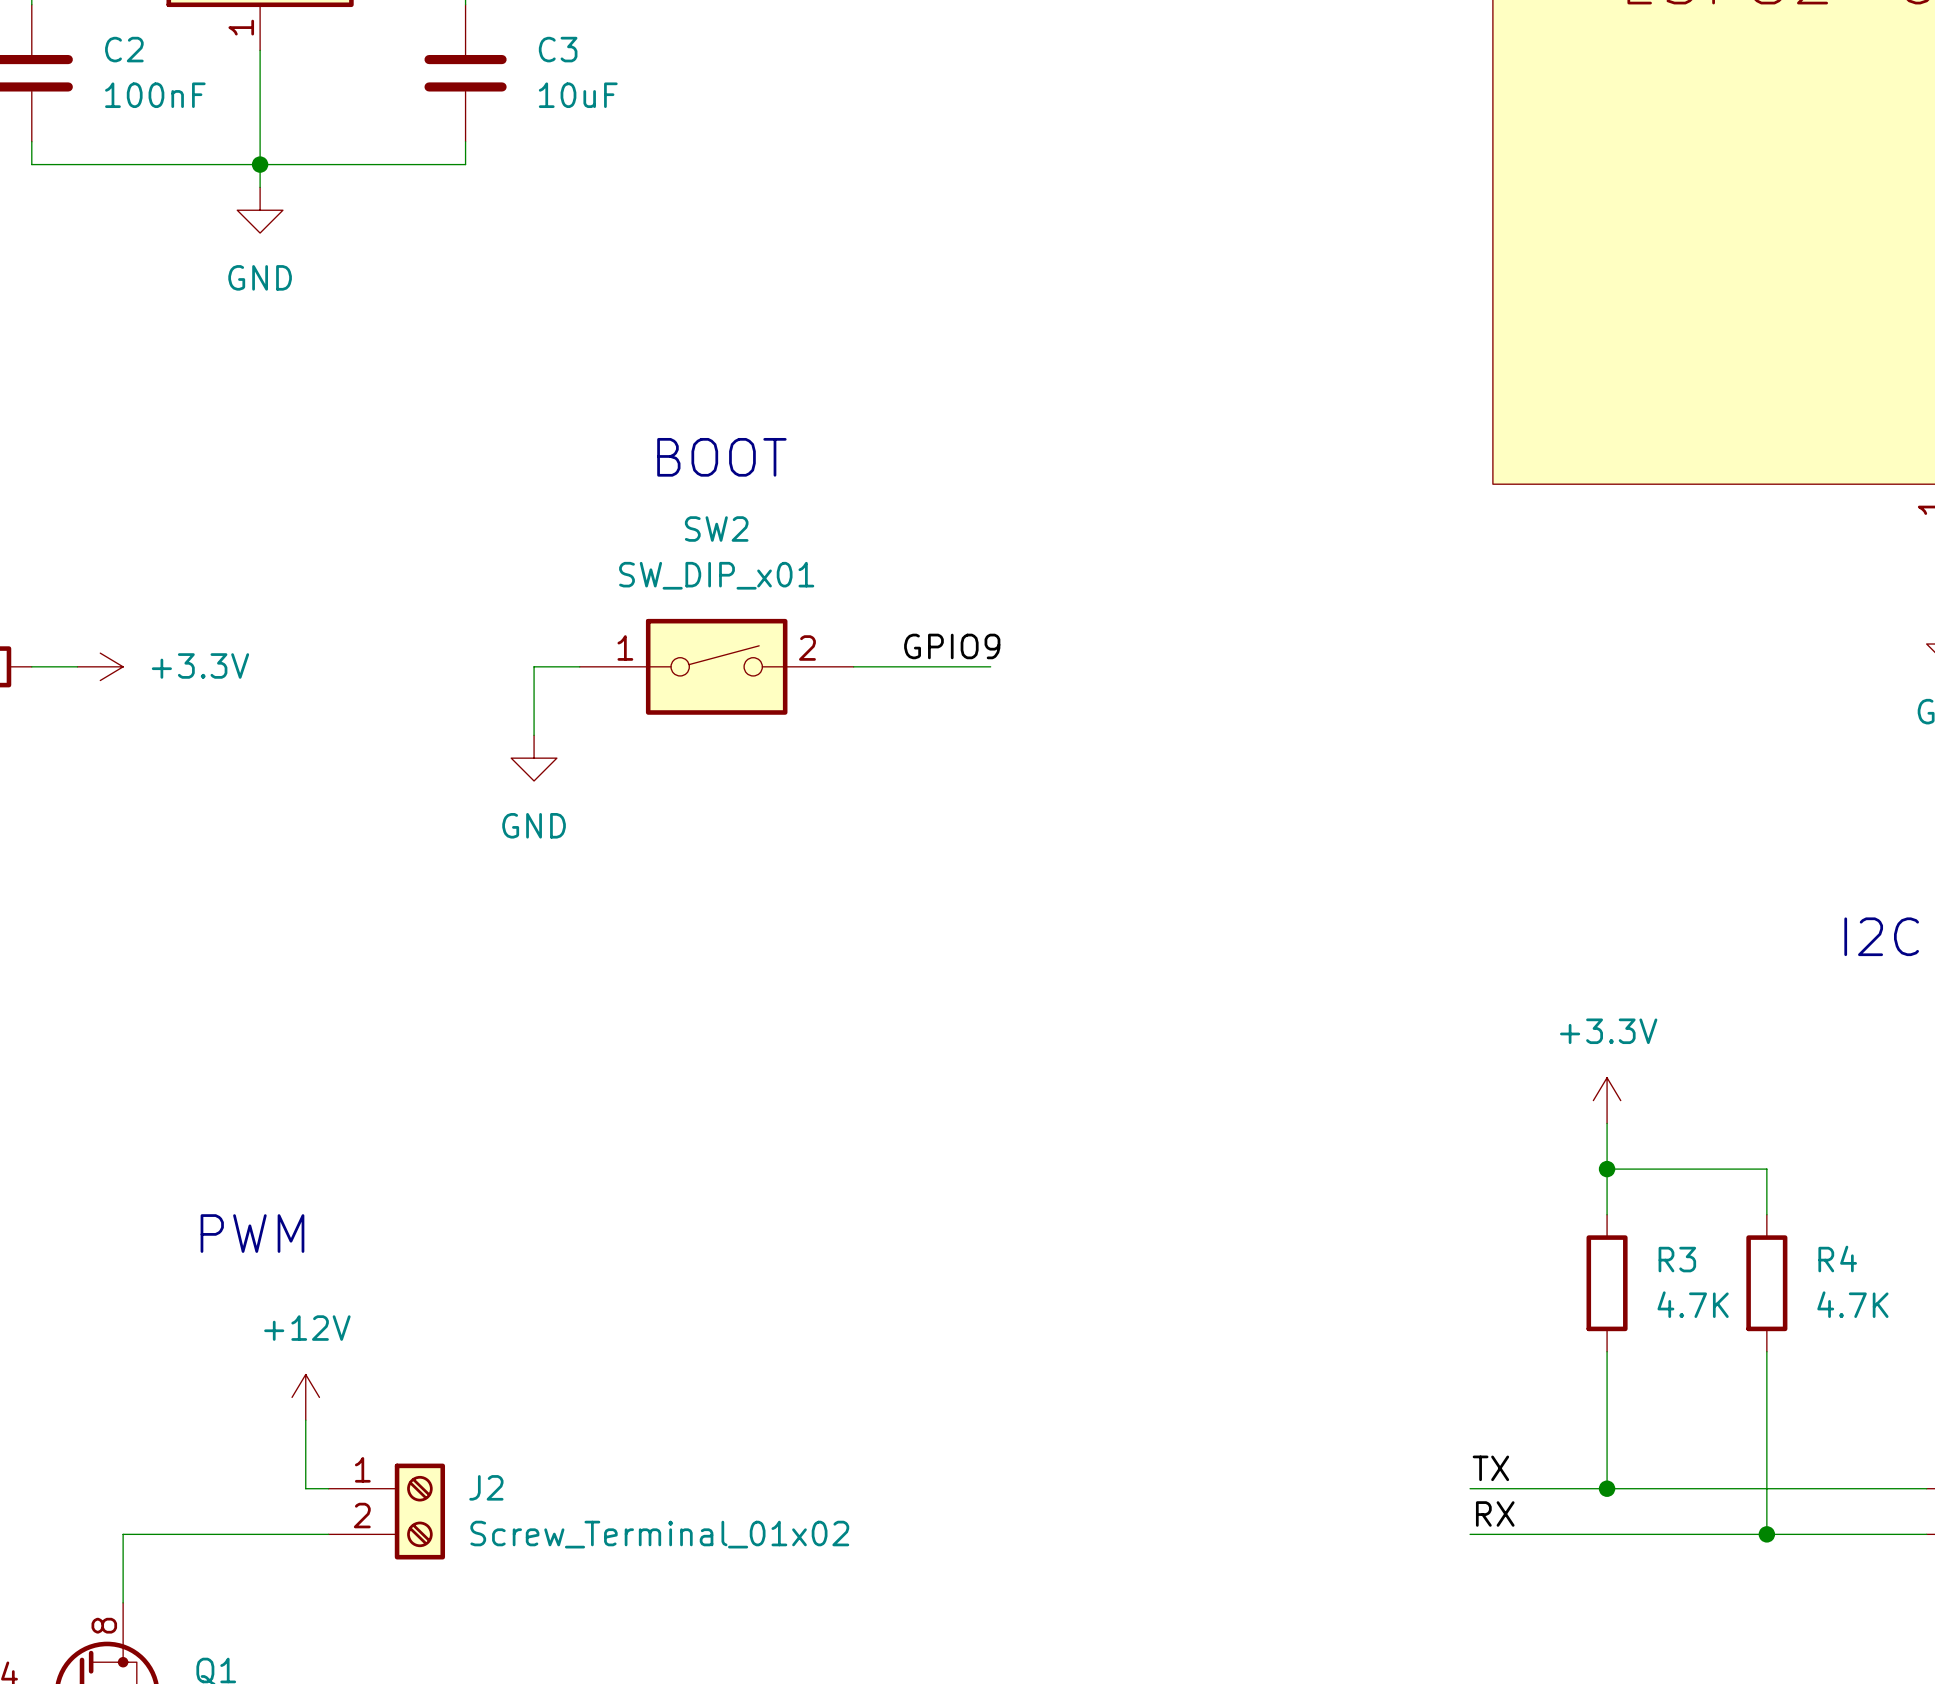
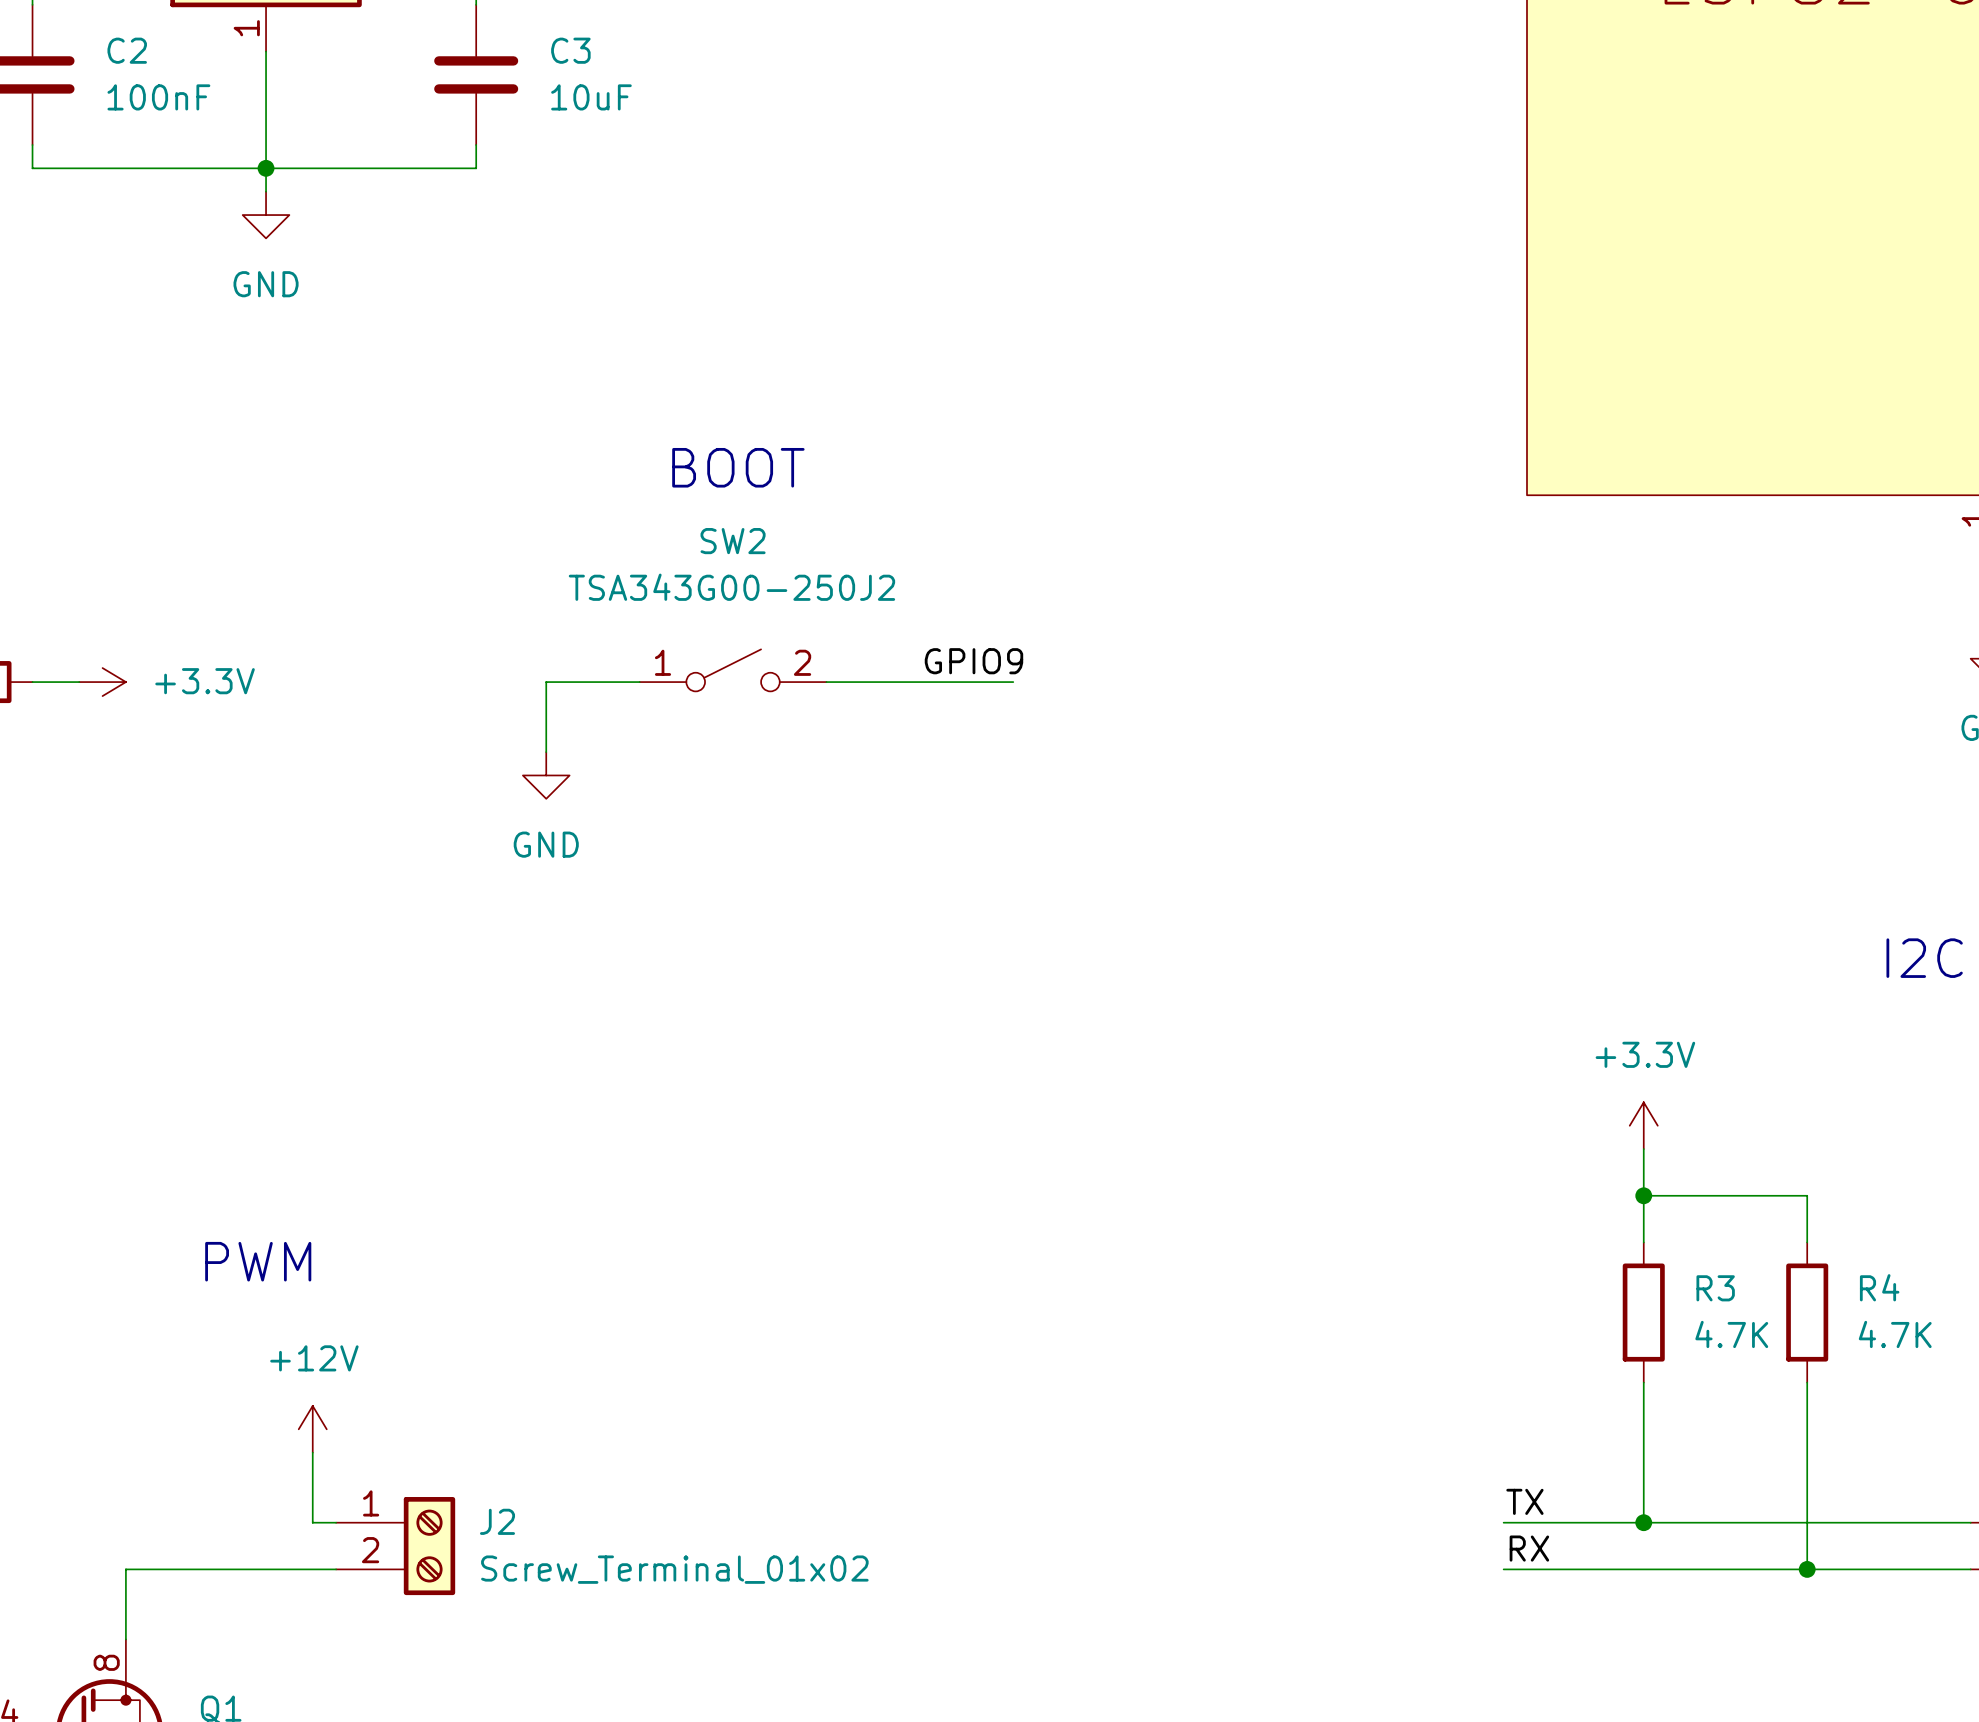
SW2 value: SW_DIP_x01 (716, 575) -> TSA343G00-250J2 (731, 587)
SW2 symbol: [579, 618, 854, 715] -> [639, 649, 827, 692]

